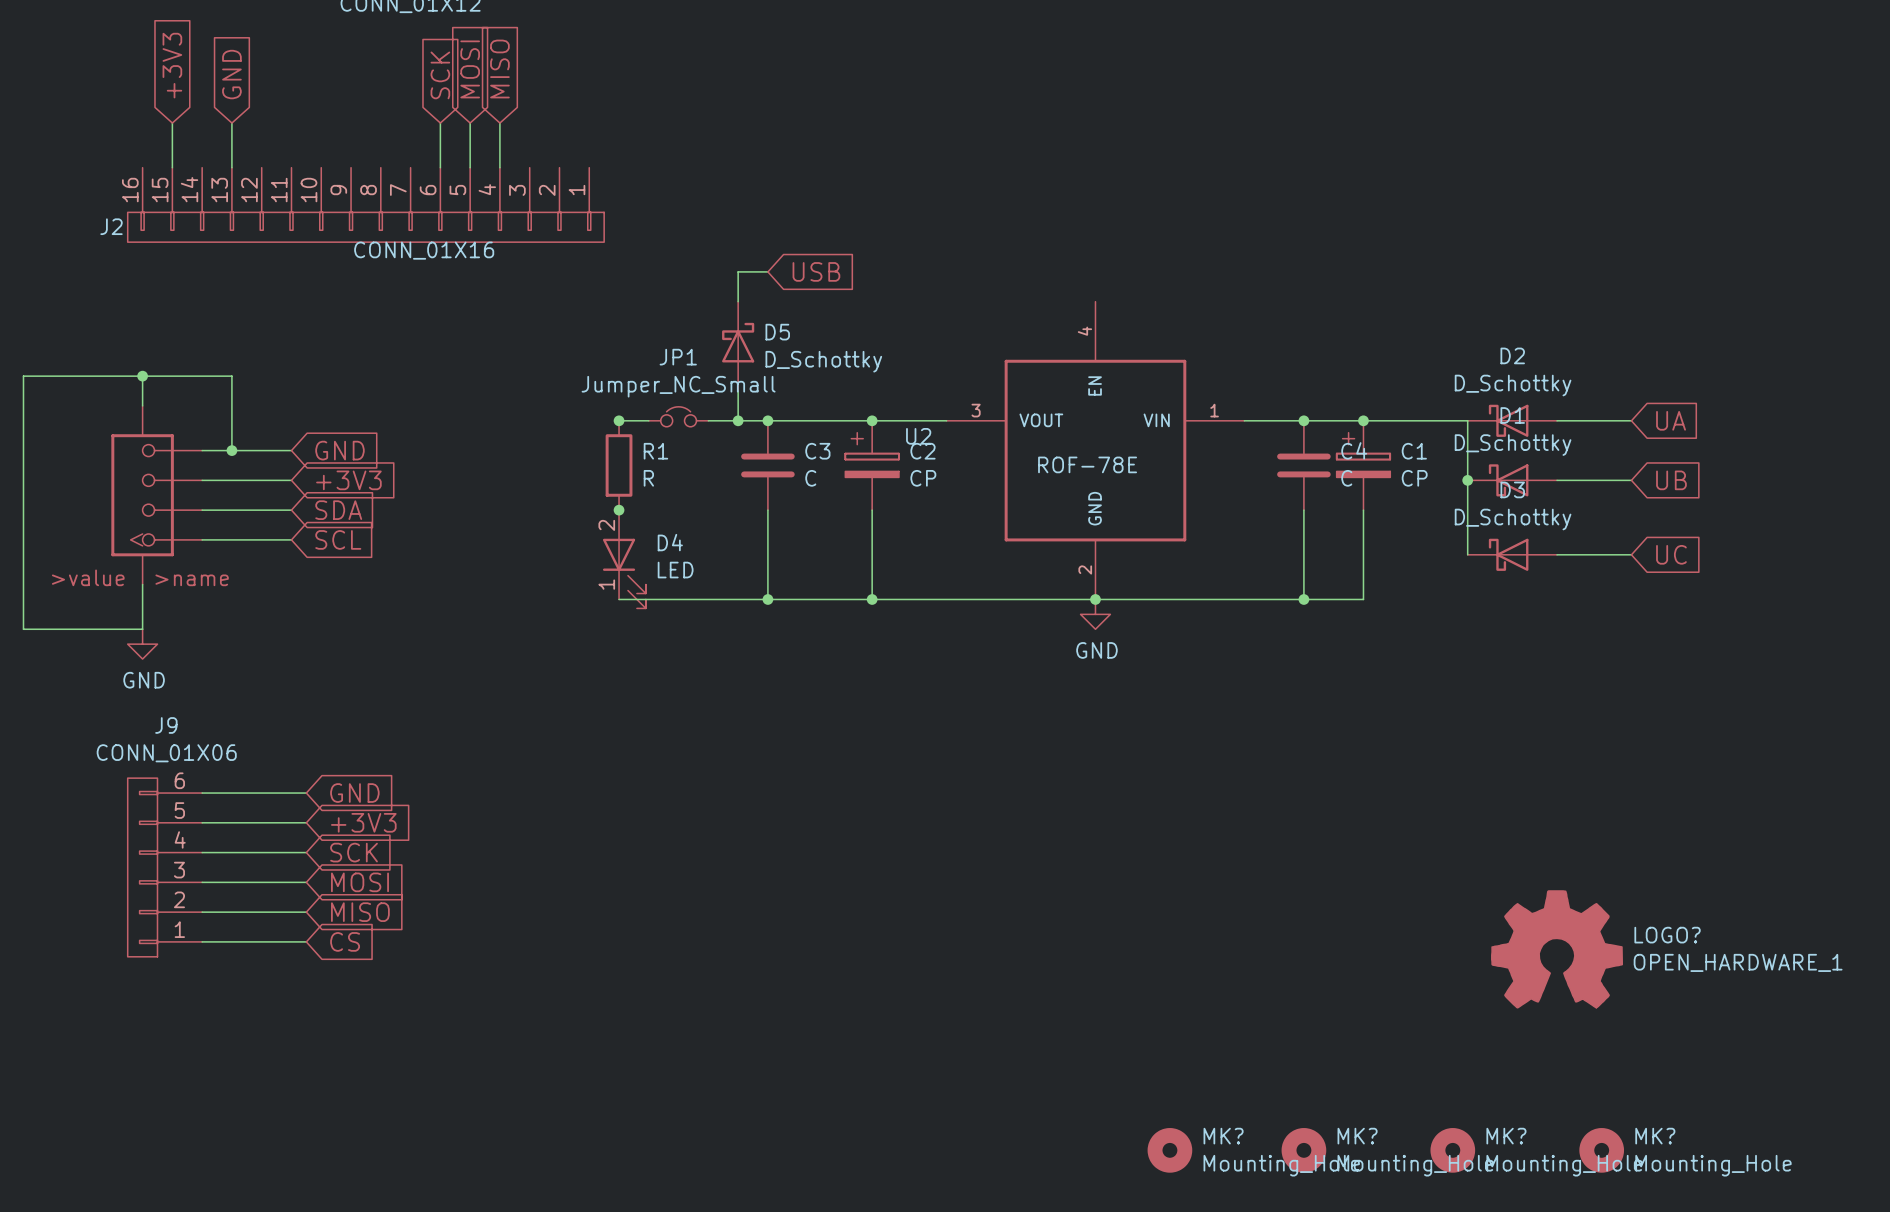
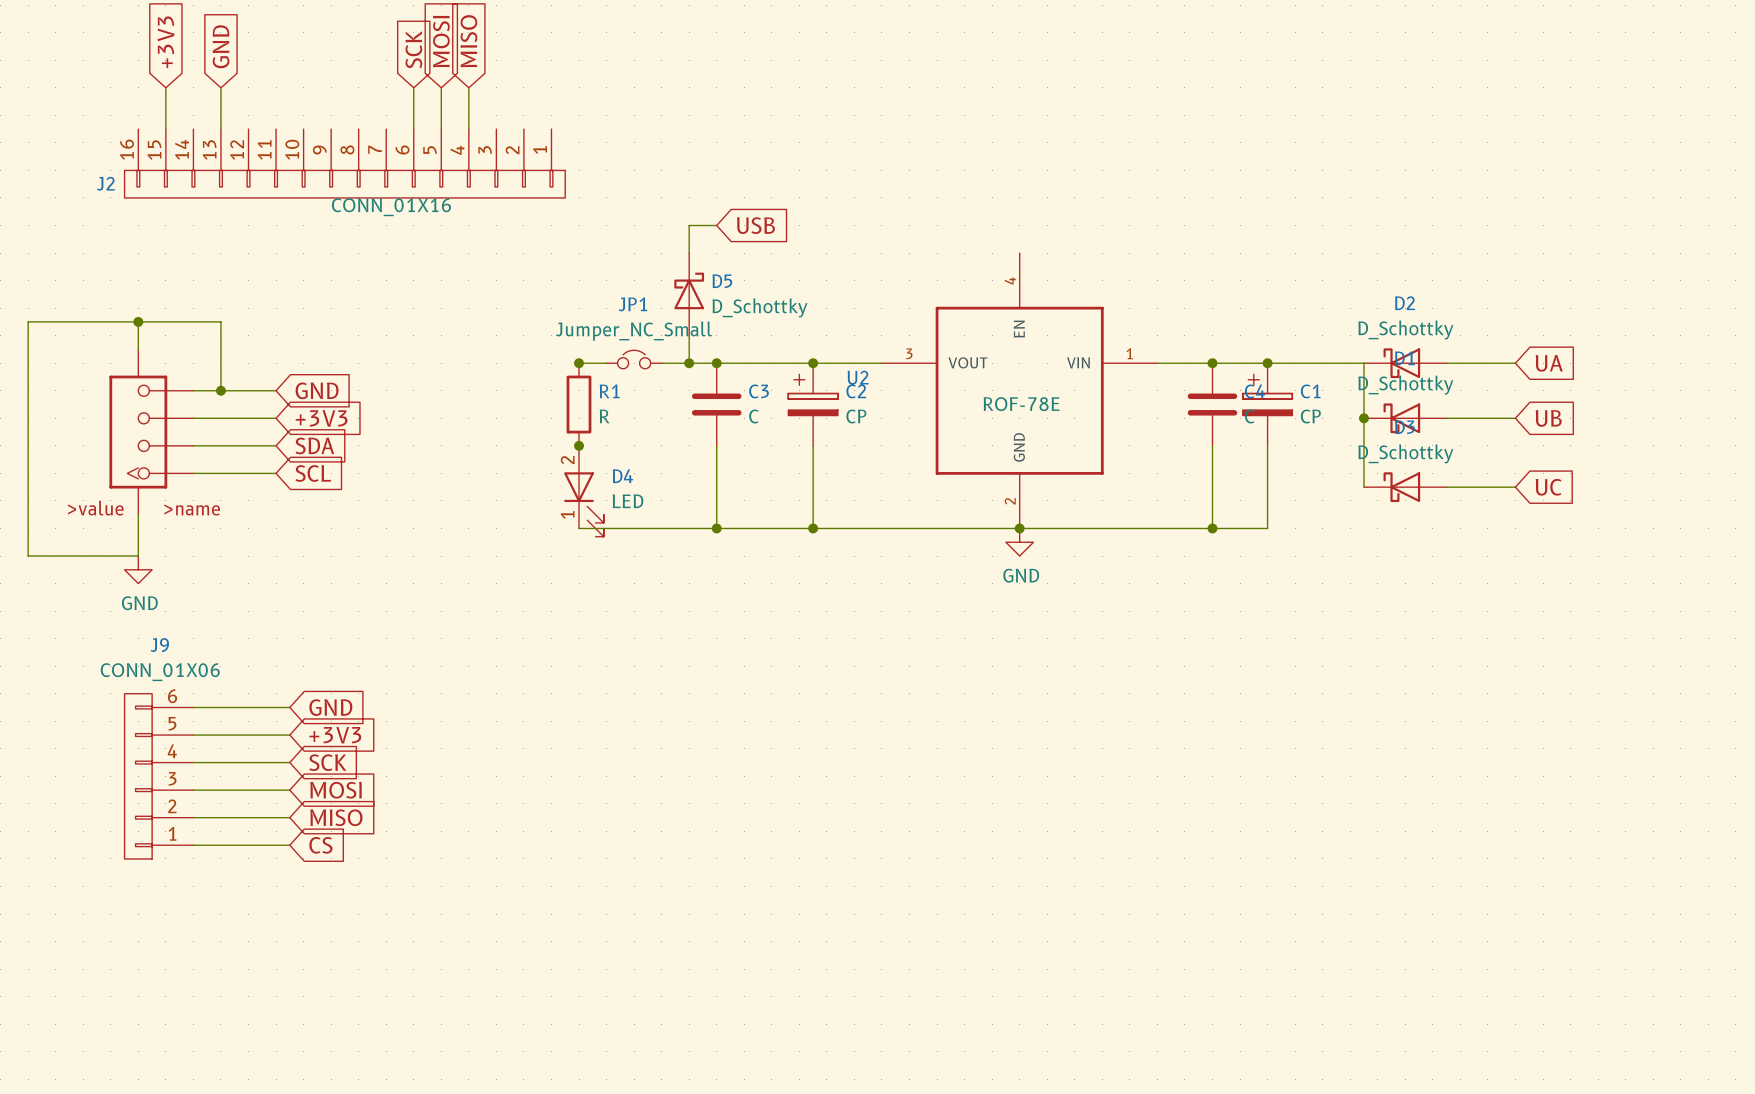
LOGO?: OPEN_HARDWARE_1 (1557, 949) -> none
MK?: Mounting_Hole (1169, 1150) -> none
MK?: Mounting_Hole (1303, 1150) -> none
MK?: Mounting_Hole (1452, 1150) -> none
MK?: Mounting_Hole (1601, 1150) -> none

